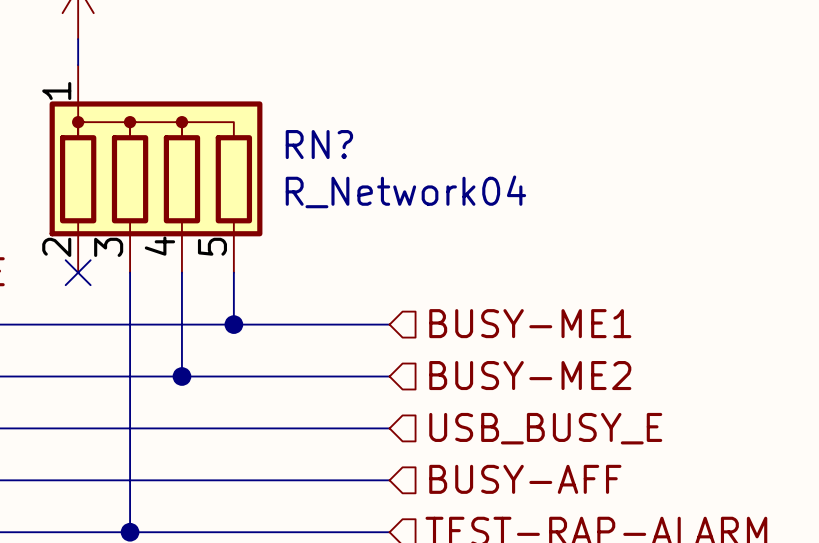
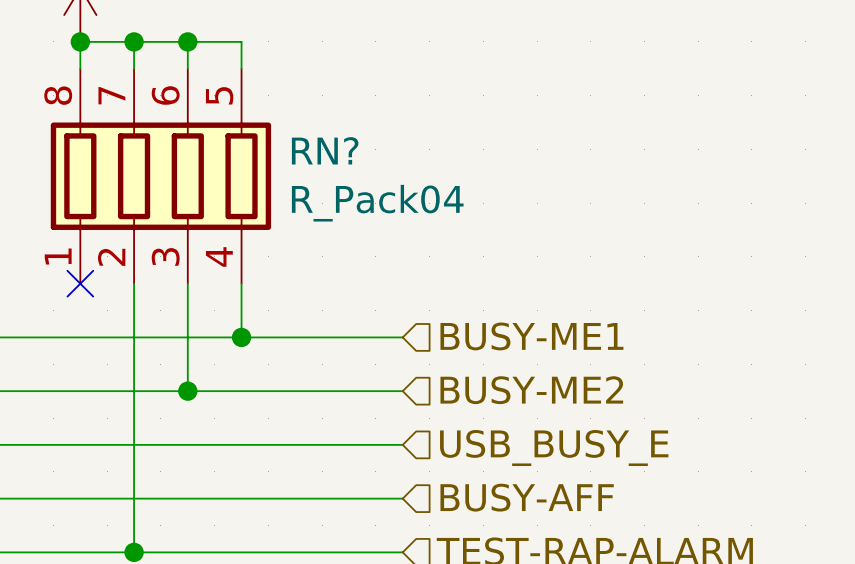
wire: none -> (80, 41) (241, 41) (241, 68)
junction: none -> (80, 41)
wire: none -> (134, 41) (134, 68)
junction: none -> (134, 41)
wire: none -> (187, 41) (187, 68)
junction: none -> (187, 41)
RN? symbol: [49, 65, 263, 273] -> [50, 68, 272, 284]
RN? value: R_Network04 (405, 191) -> R_Pack04 (377, 203)

